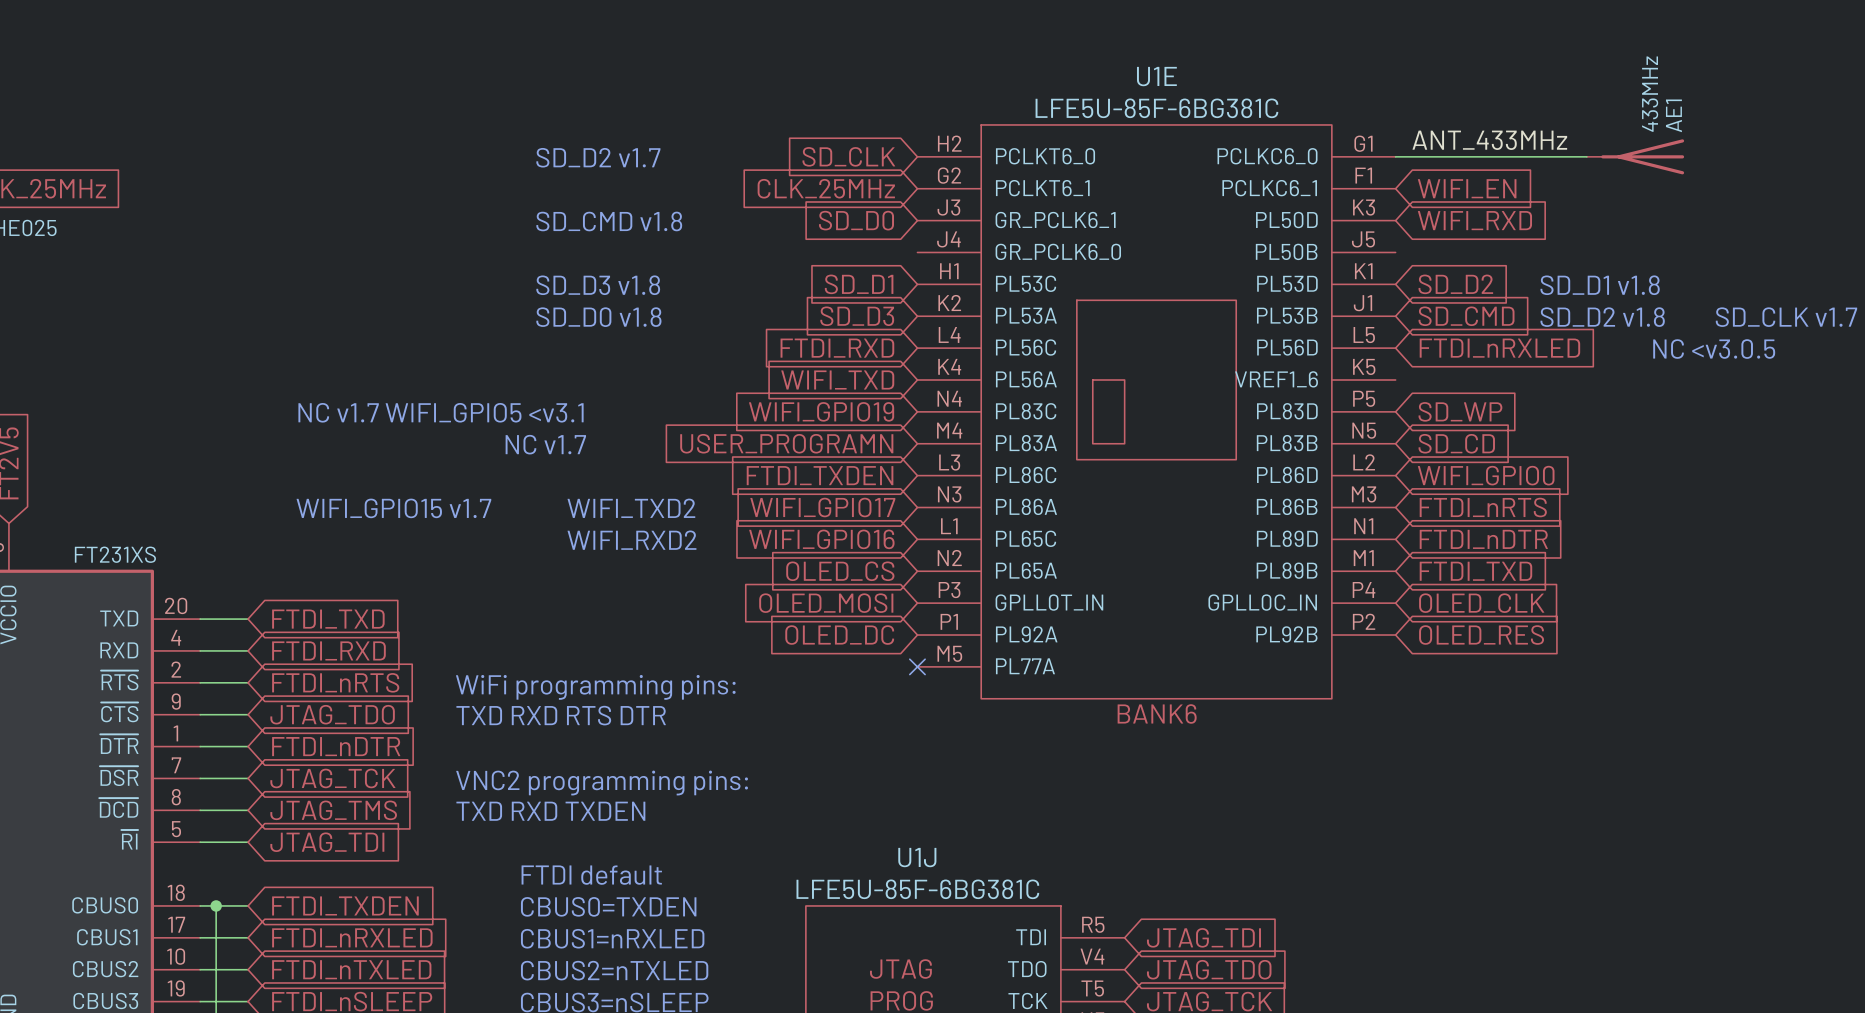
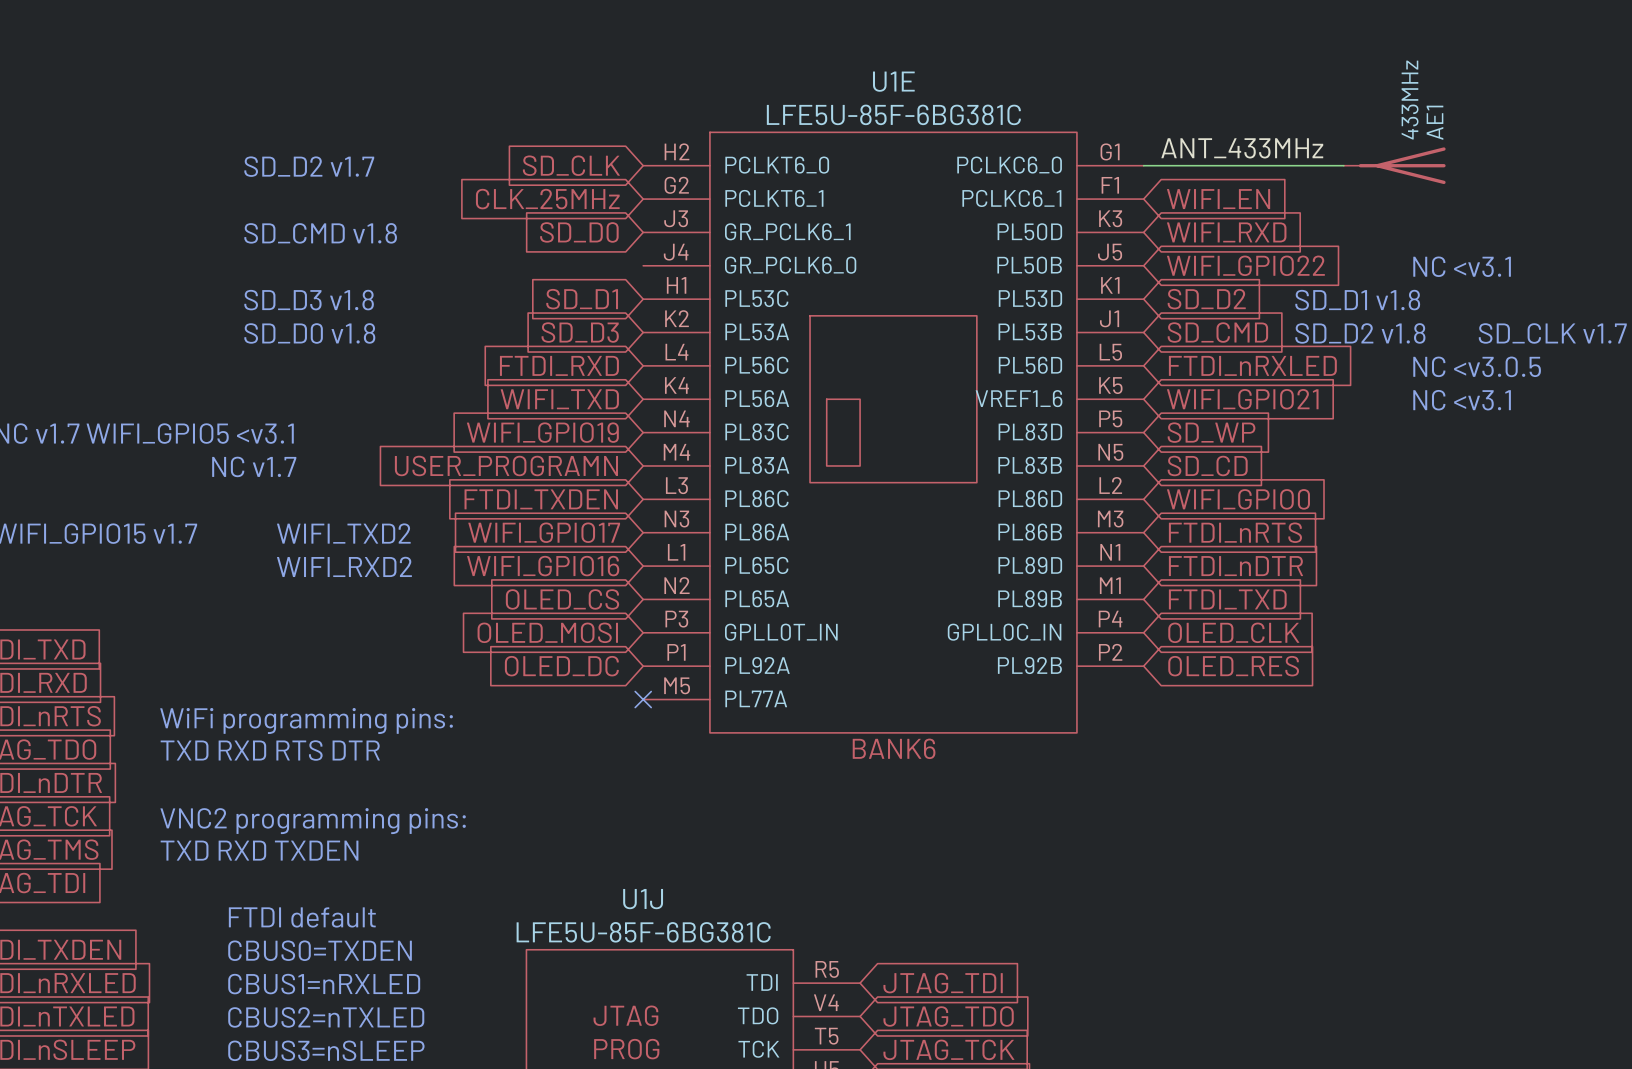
global label: none -> WIFI_GPIO22 (1245, 265)
text: none -> NC <v3.1 (1462, 266)
global label: none -> WIFI_GPIO21 (1242, 399)
text: none -> NC <v3.1 (1462, 400)

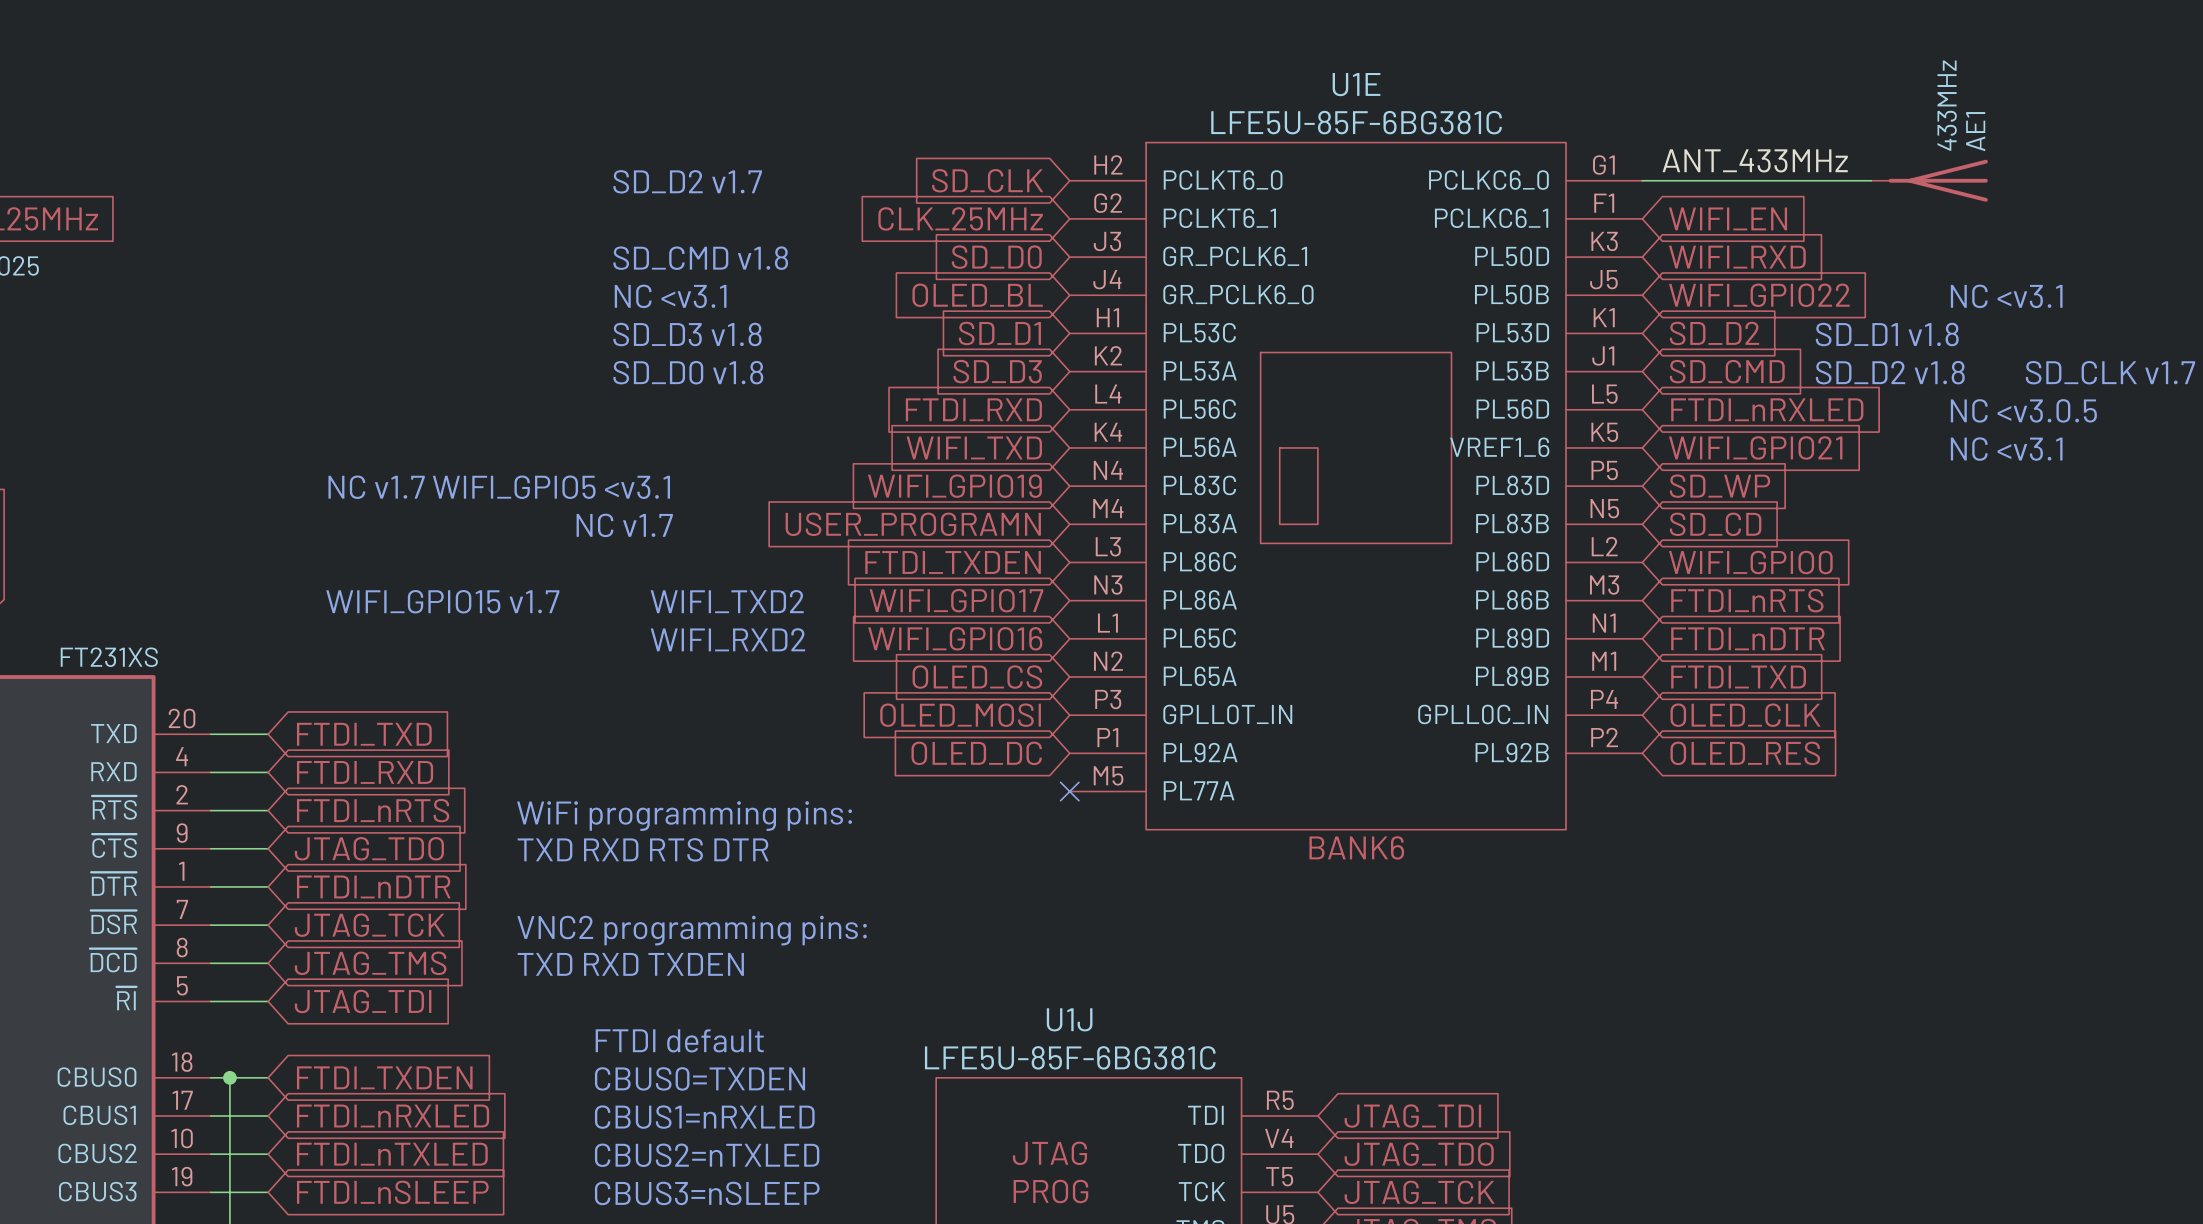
global label: none -> OLED_BL (977, 295)
text: none -> NC <v3.1 (670, 296)

